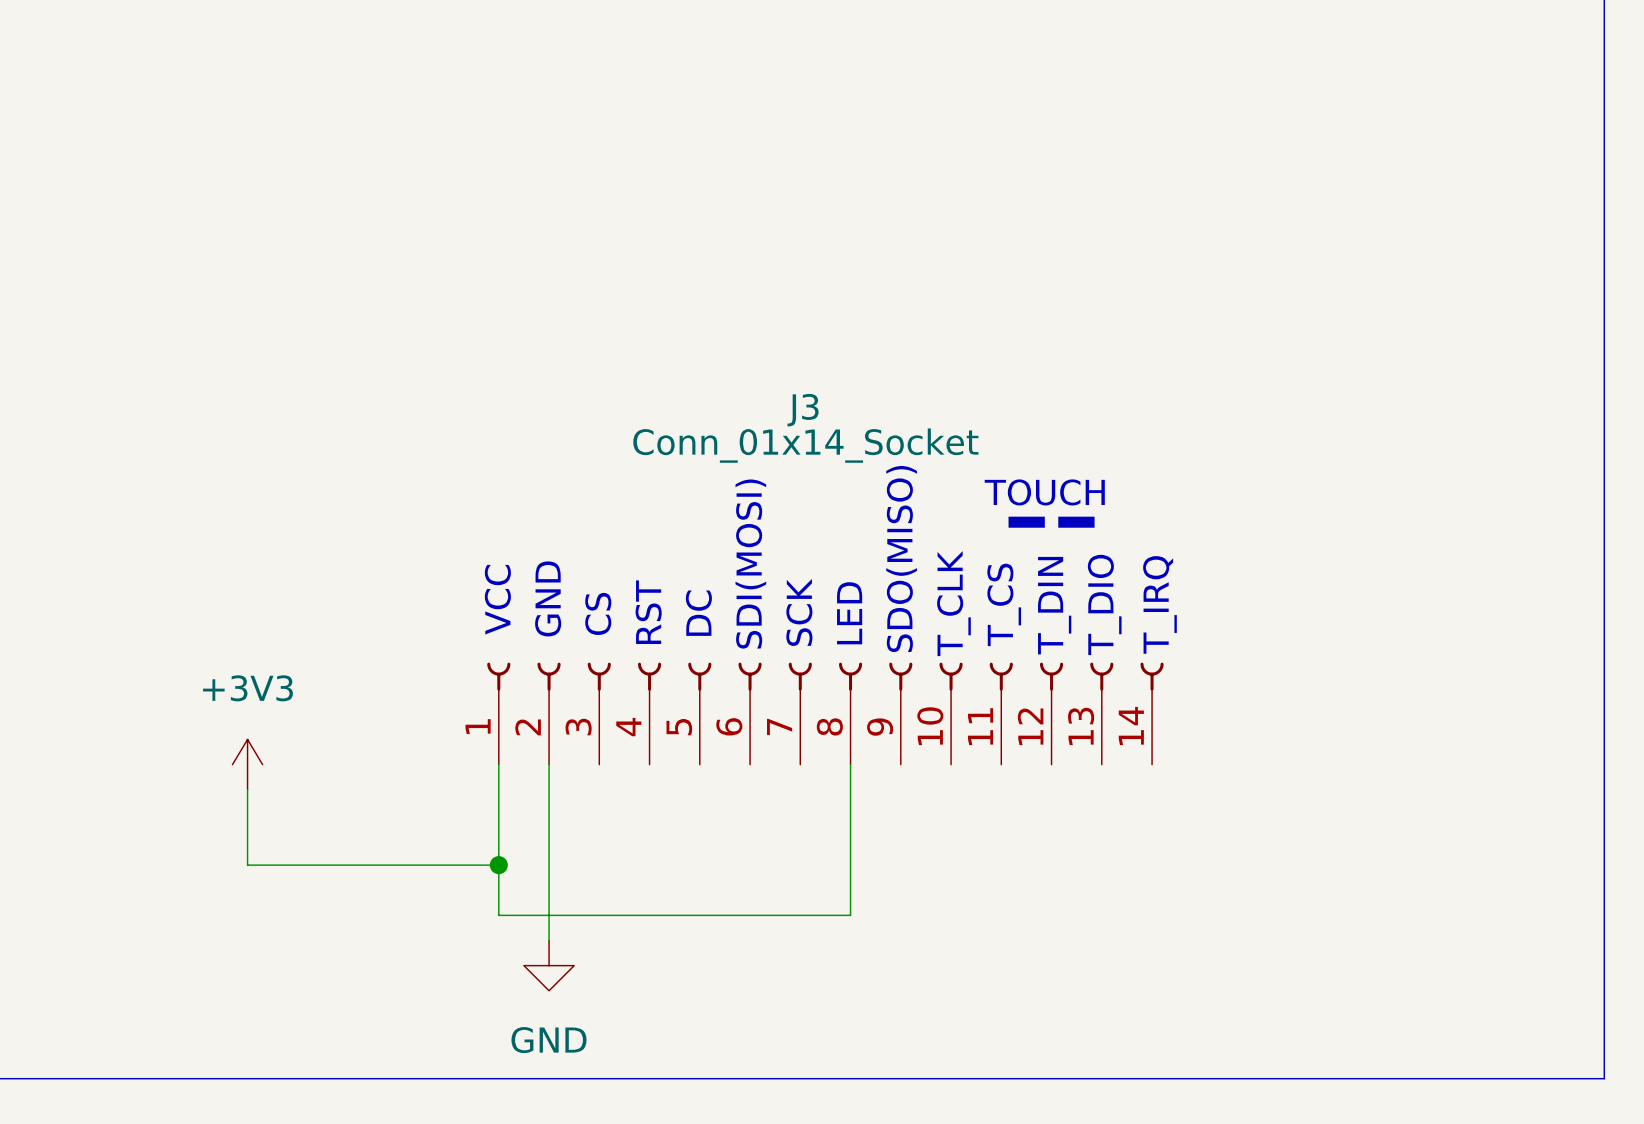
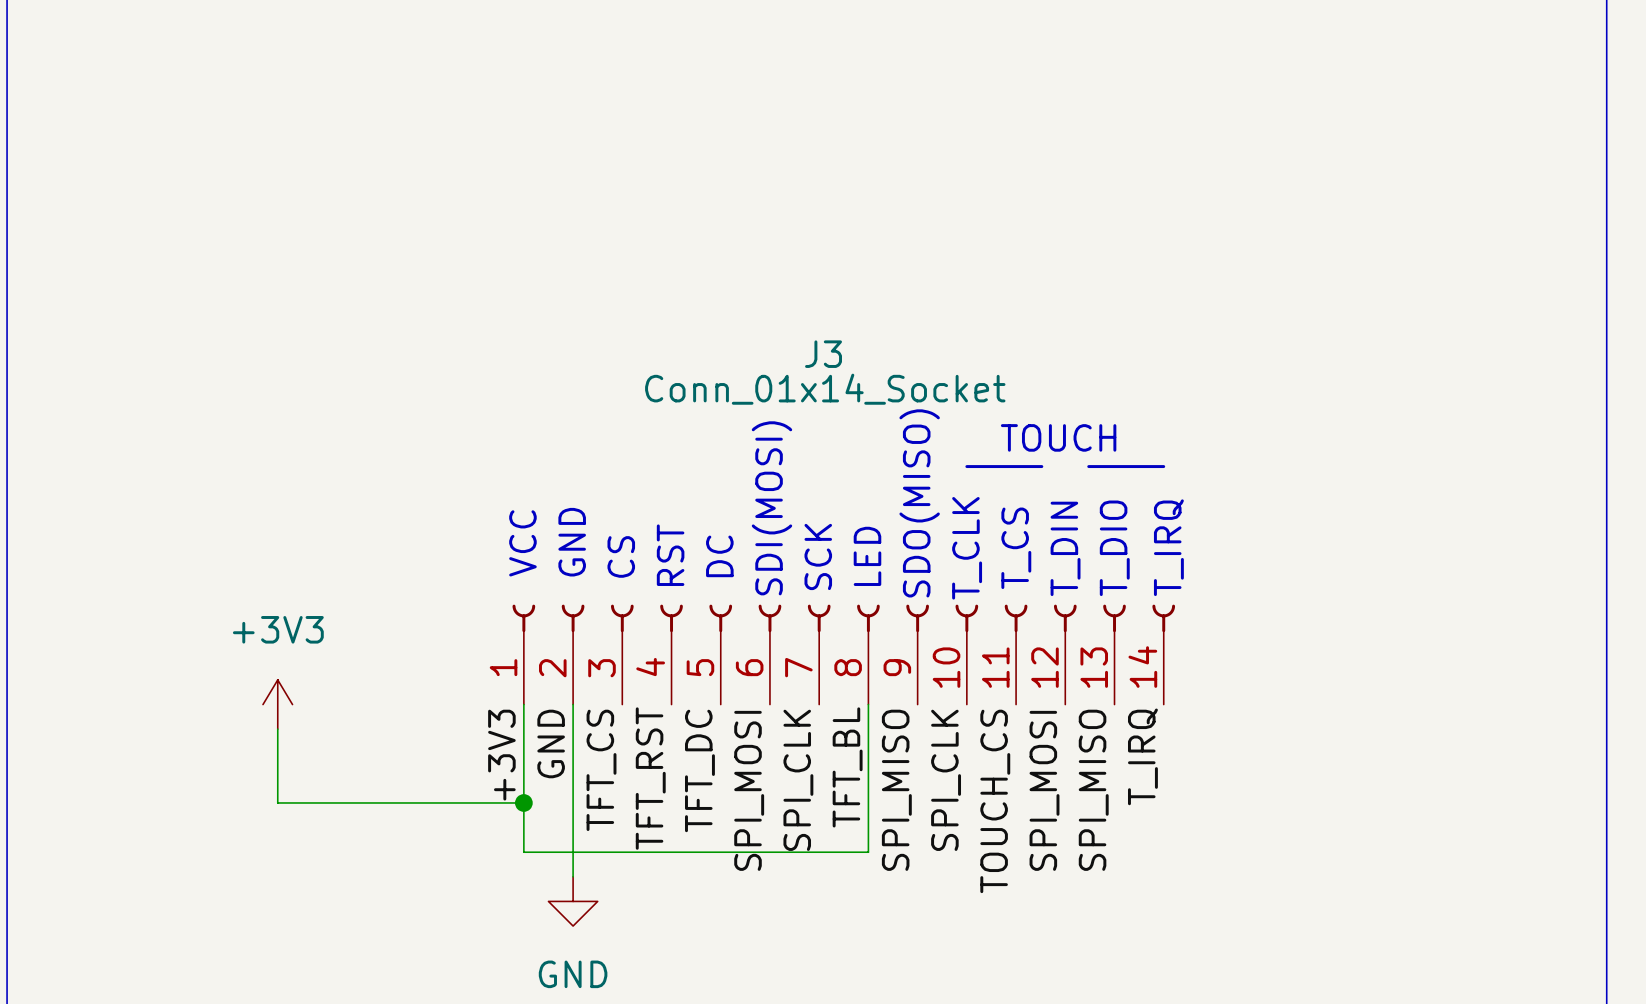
label: none -> GND (551, 743)
label: none -> +3V3 (501, 755)
label: none -> T_IRQ (1142, 756)
label: none -> TFT_BL (847, 767)
label: none -> TFT_CS (601, 770)
label: none -> TFT_DC (699, 770)
label: none -> SPI_CLK (798, 780)
label: none -> SPI_CLK (946, 780)
label: none -> TFT_RST (650, 778)
label: none -> SPI_MISO (896, 790)
label: none -> SPI_MISO (1093, 790)
label: none -> SPI_MOSI (749, 790)
label: none -> SPI_MOSI (1044, 790)
label: none -> TOUCH_CS (995, 801)

